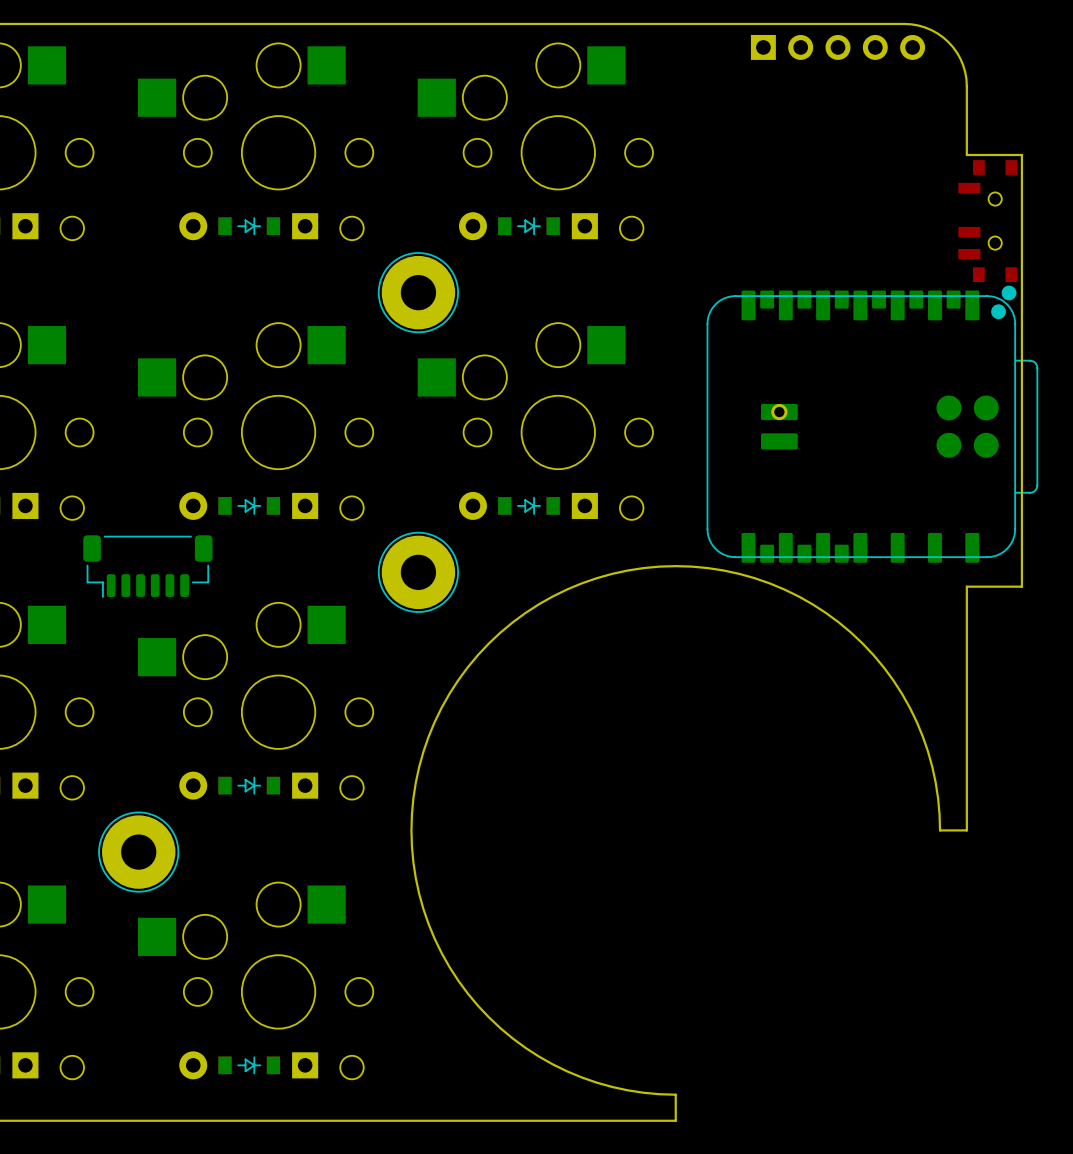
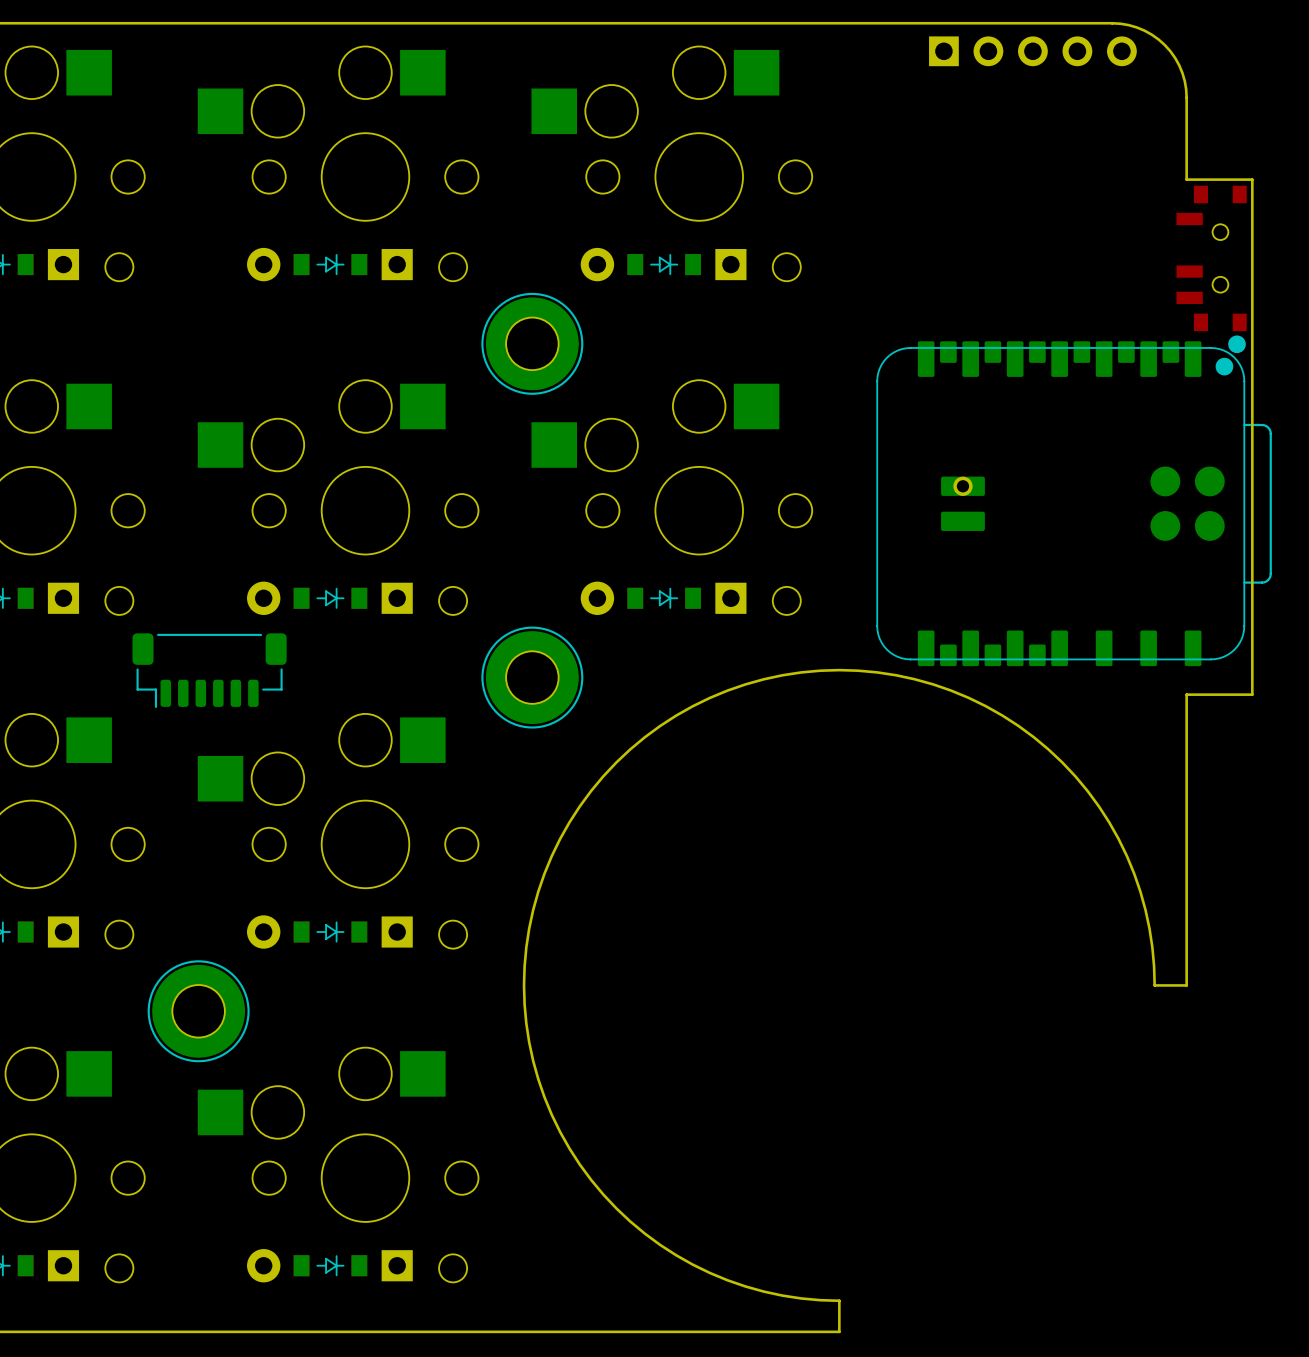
part footprint: [377, 252, 459, 334] -> [481, 292, 584, 395]
part footprint: [377, 531, 459, 613] -> [481, 626, 584, 729]
part footprint: [98, 811, 180, 893] -> [147, 960, 250, 1063]

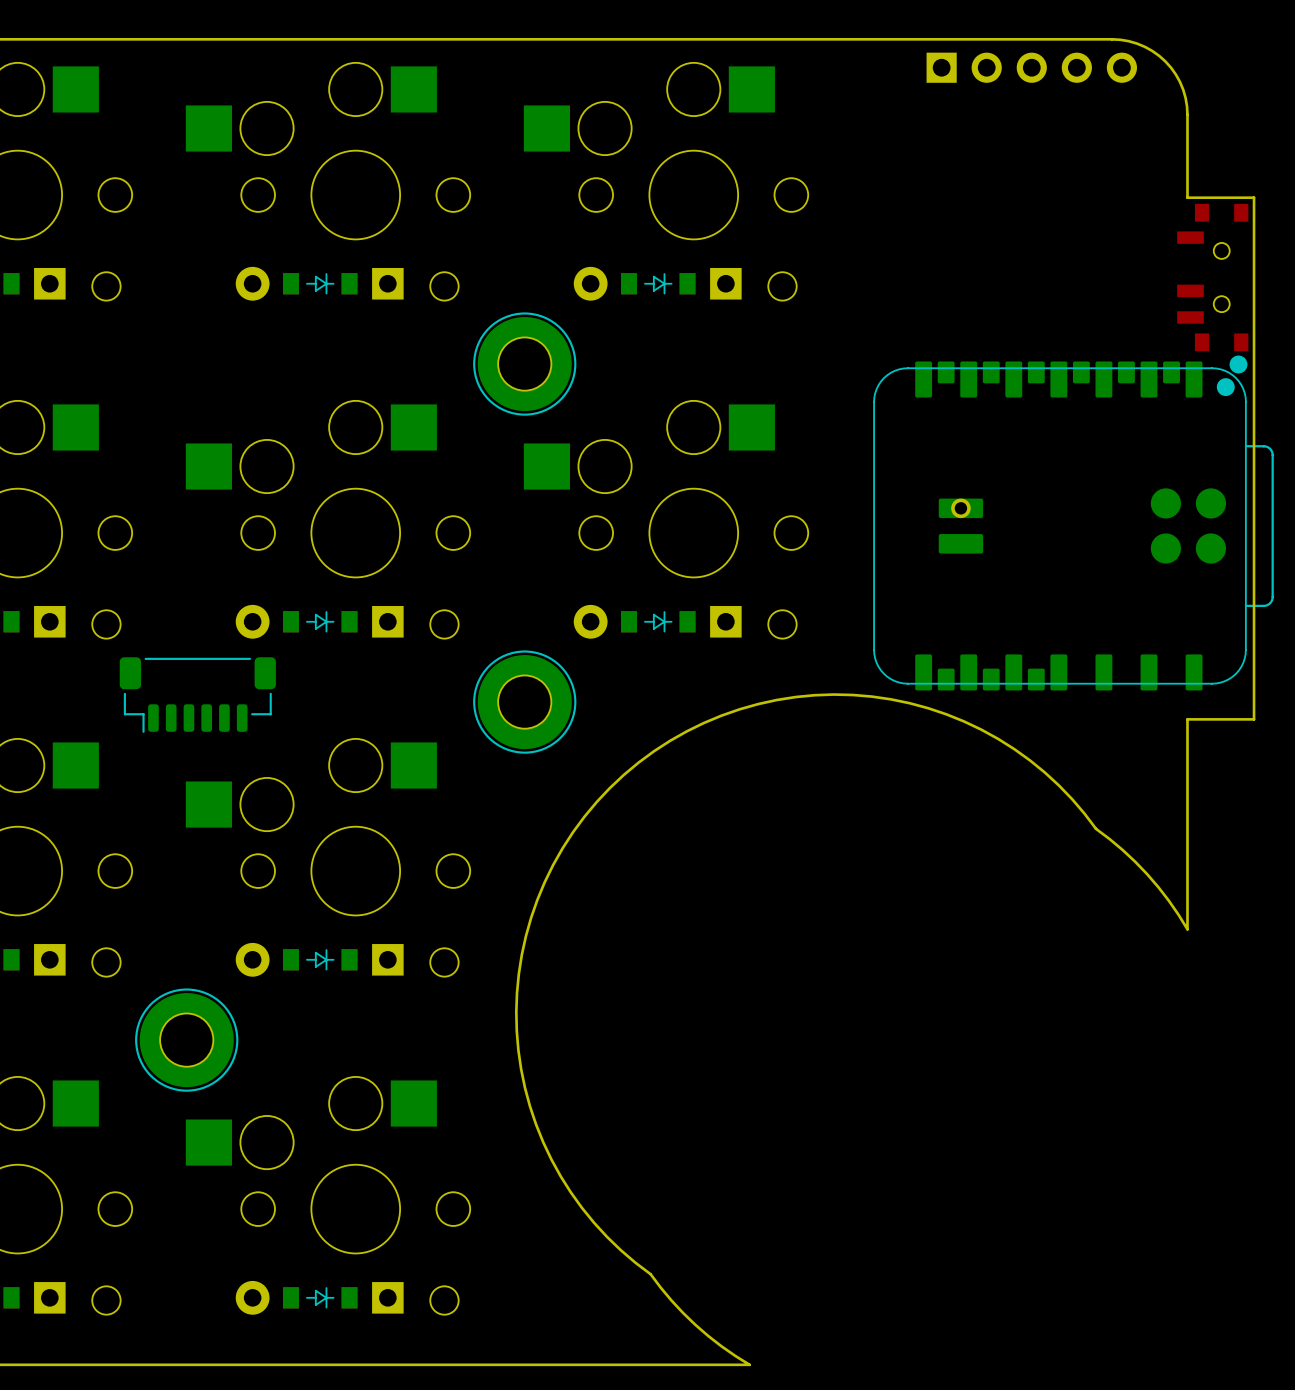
board edge: (1186, 694) (1186, 985) (1154, 985) (1149, 928) (1134, 873) (1109, 822) (1075, 776) (1048, 749) (1018, 725) (968, 697) (933, 684) (896, 675) (839, 670) (801, 672) (745, 684) (709, 697) (660, 725) (616, 762) (579, 806) (560, 838) (544, 873) (529, 928) (524, 966) (524, 1004) (529, 1042) (538, 1079) (551, 1114) (579, 1164) (616, 1208) (644, 1233) (692, 1264) (745, 1286) (782, 1295) (839, 1300) (839, 1331) (754, 1331) -> (1187, 719) (1187, 929) (1168, 900) (1147, 874) (1122, 850) (1096, 828) (1072, 799) (1029, 760) (998, 738) (963, 721) (928, 708) (890, 699) (833, 694) (795, 697) (757, 704) (721, 715) (686, 731) (638, 762) (609, 788) (573, 832) (553, 864) (537, 899) (525, 936) (518, 973) (516, 1011) (518, 1050) (529, 1106) (551, 1159) (570, 1192) (594, 1222) (620, 1250) (650, 1274) (671, 1300) (695, 1324) (721, 1346) (749, 1364)

